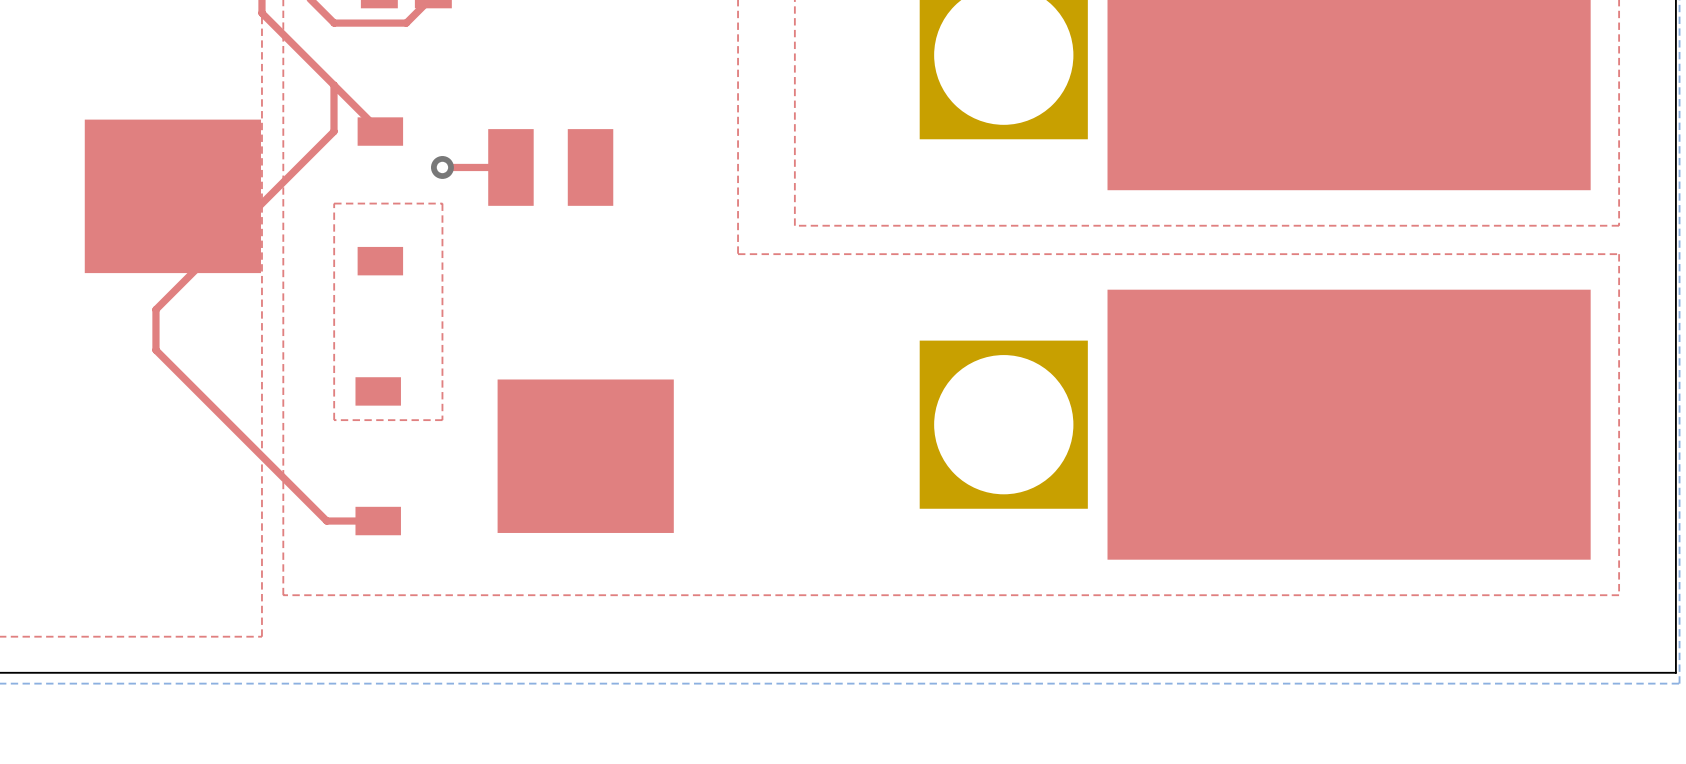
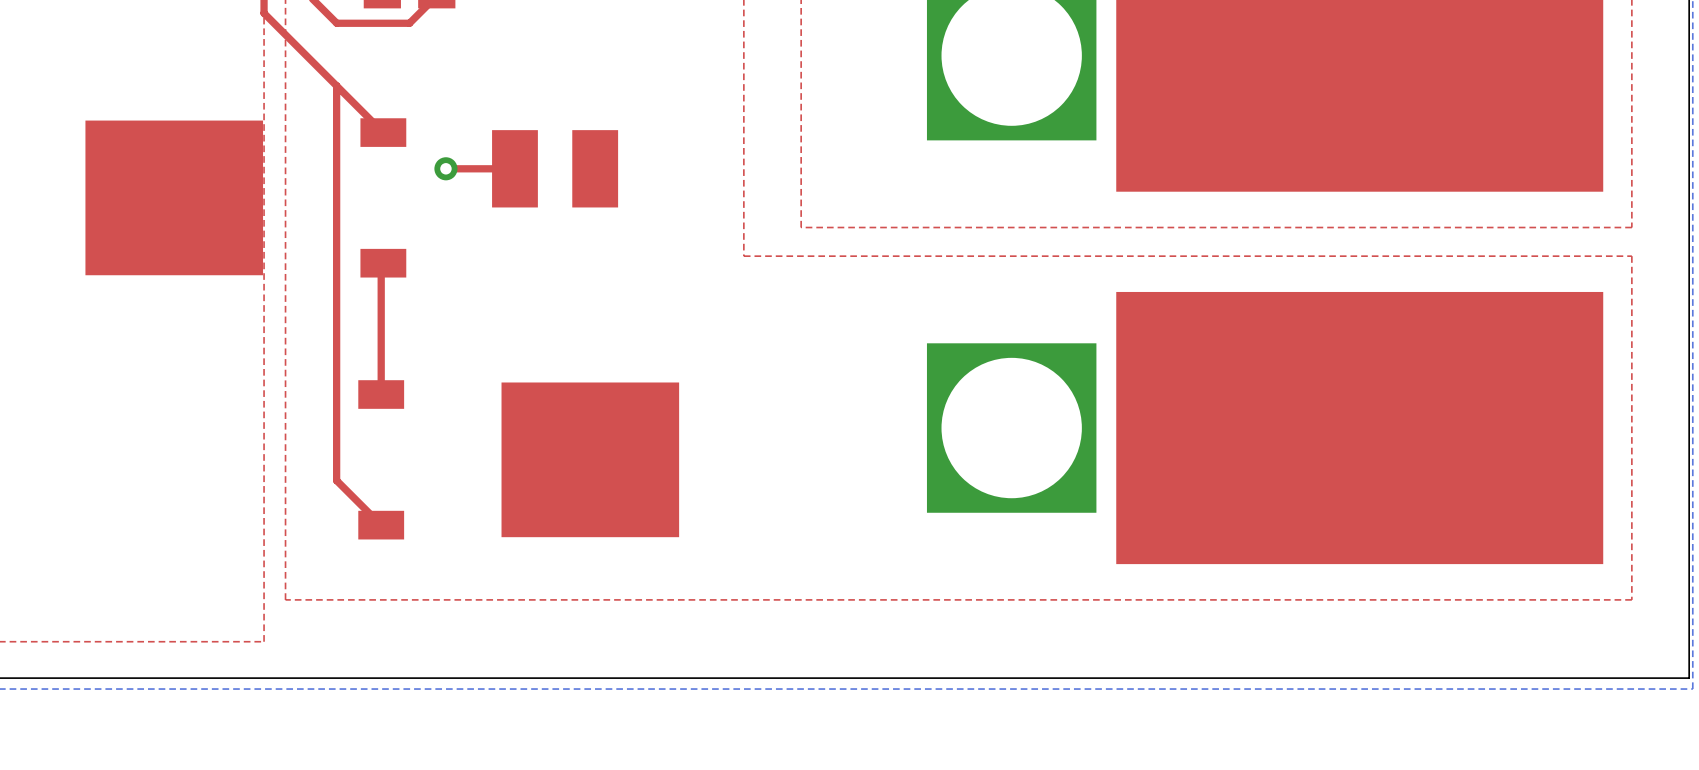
top track: (334, 131) (155, 309) (155, 350) (326, 521) (378, 521) -> (336, 132) (336, 480) (381, 525)
top zone outline: (442, 203) (442, 420) (334, 420) (334, 203) (442, 203) -> none
top track: none -> (383, 263) (381, 265) (381, 394)

